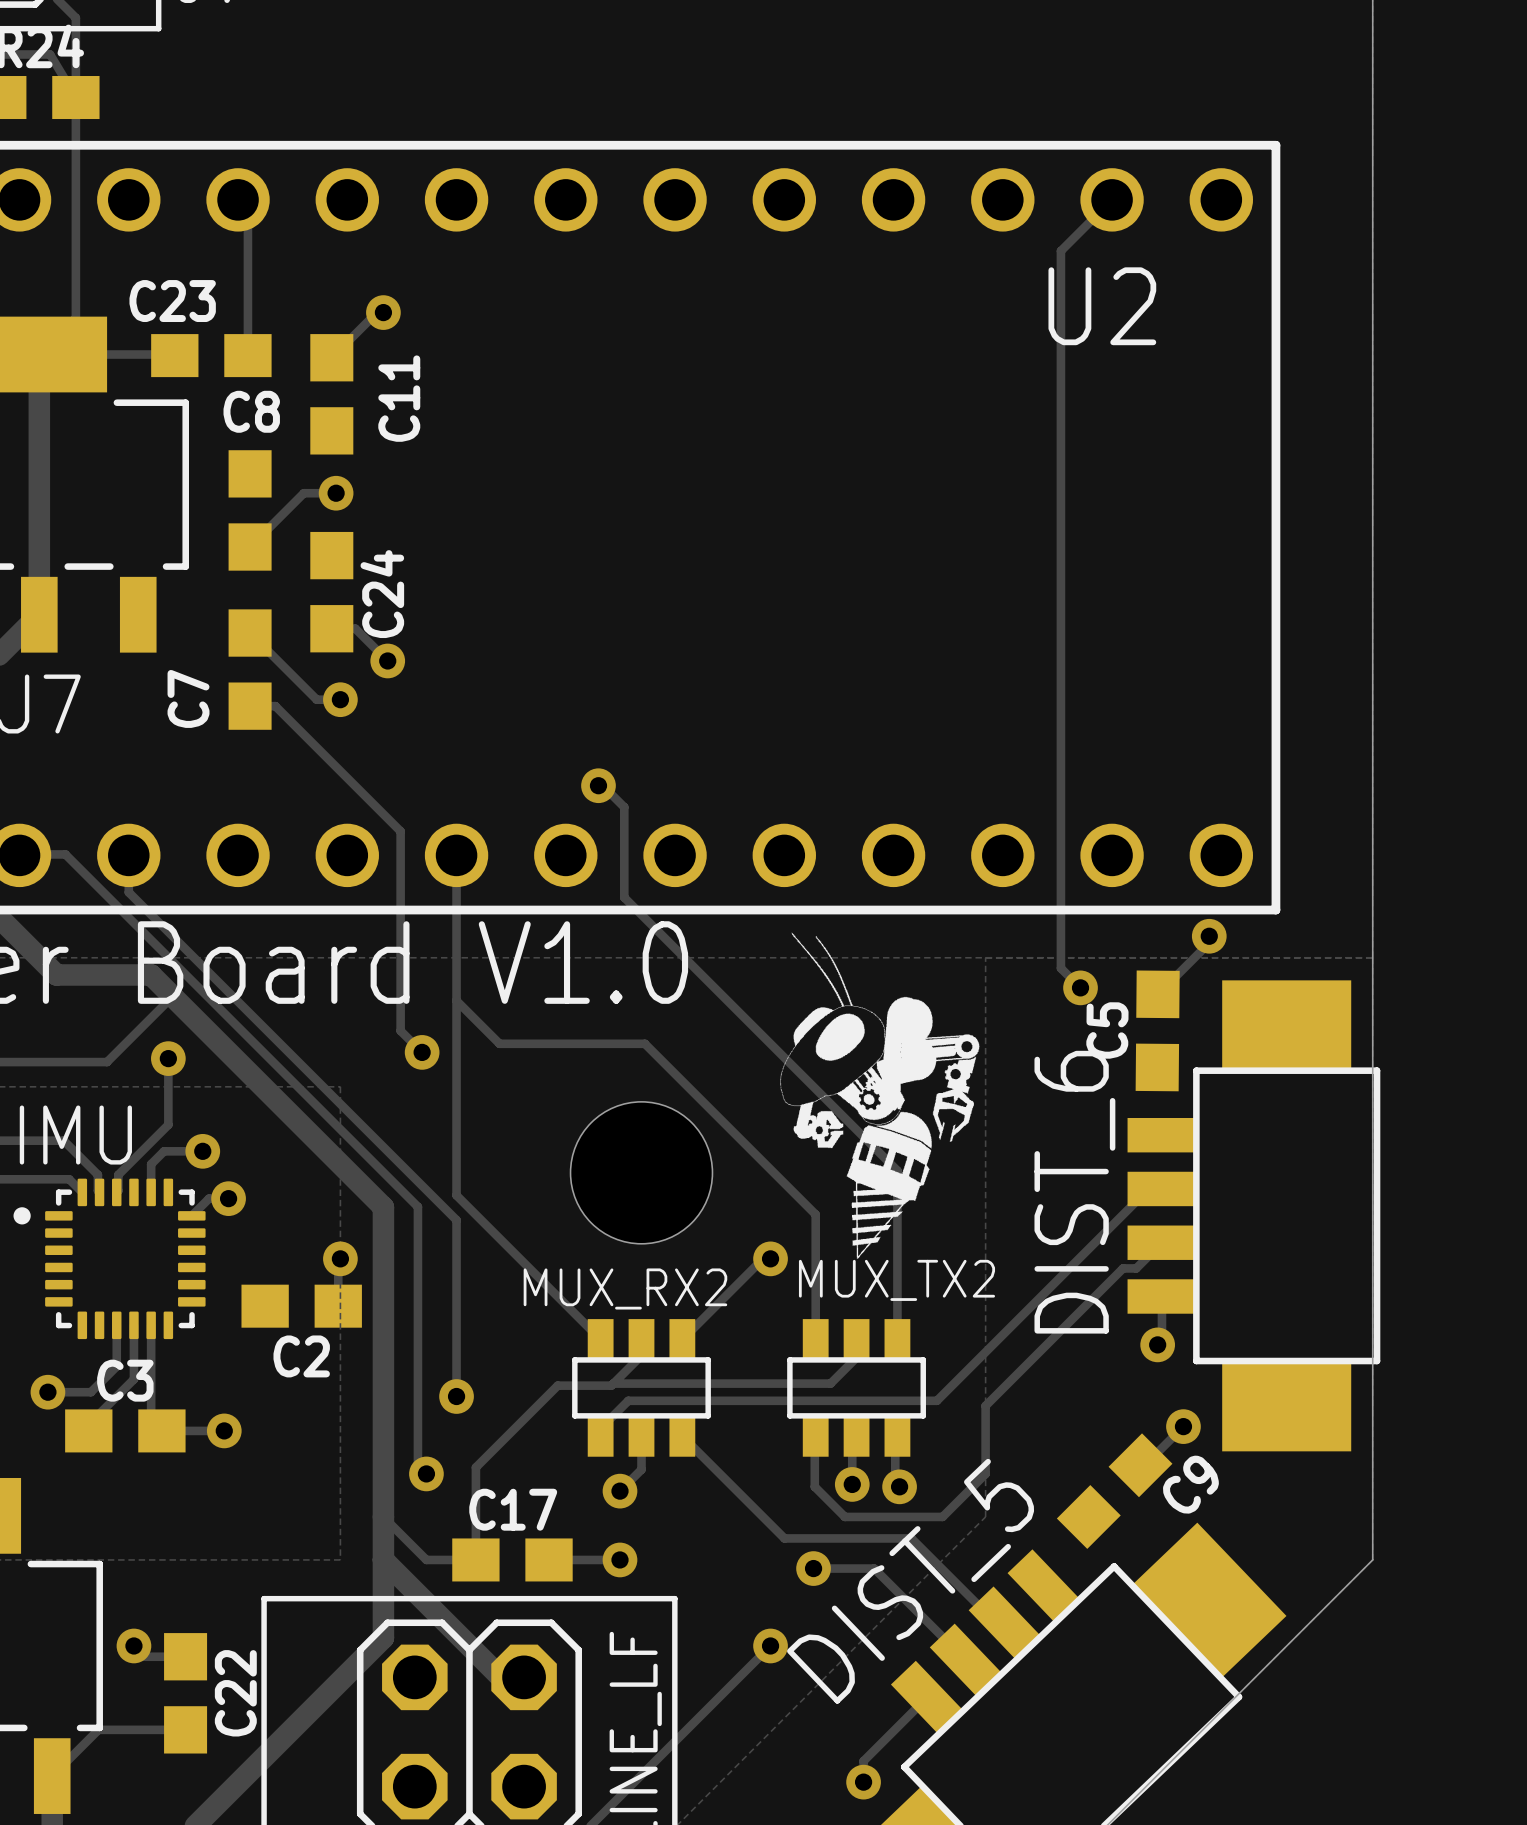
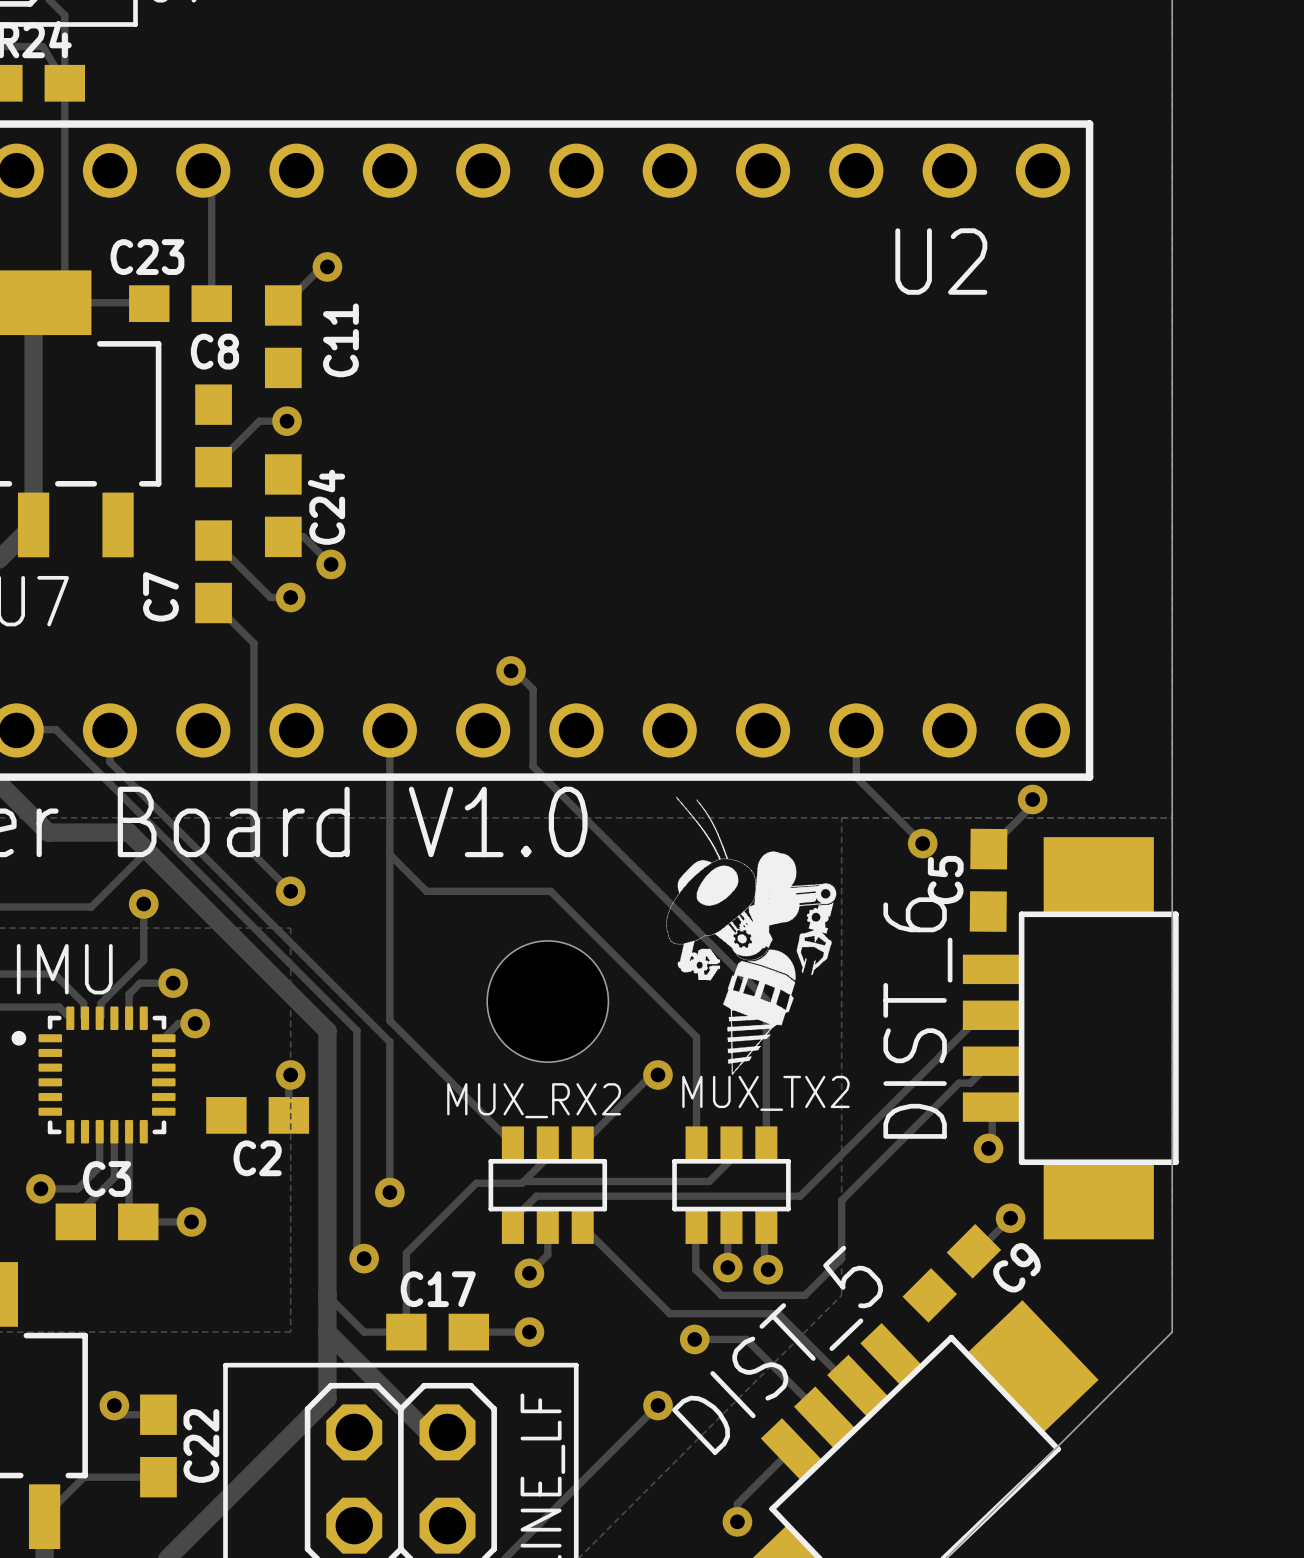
track: (1112, 199) (1060, 251) (1060, 968) -> (856, 730) (856, 777) (905, 826)
track: (250, 706) (275, 706) (400, 831) (400, 1030) (422, 1052) -> (213, 603) (253, 643) (253, 854) (290, 891)
via position: (422, 1052) -> (290, 891)

